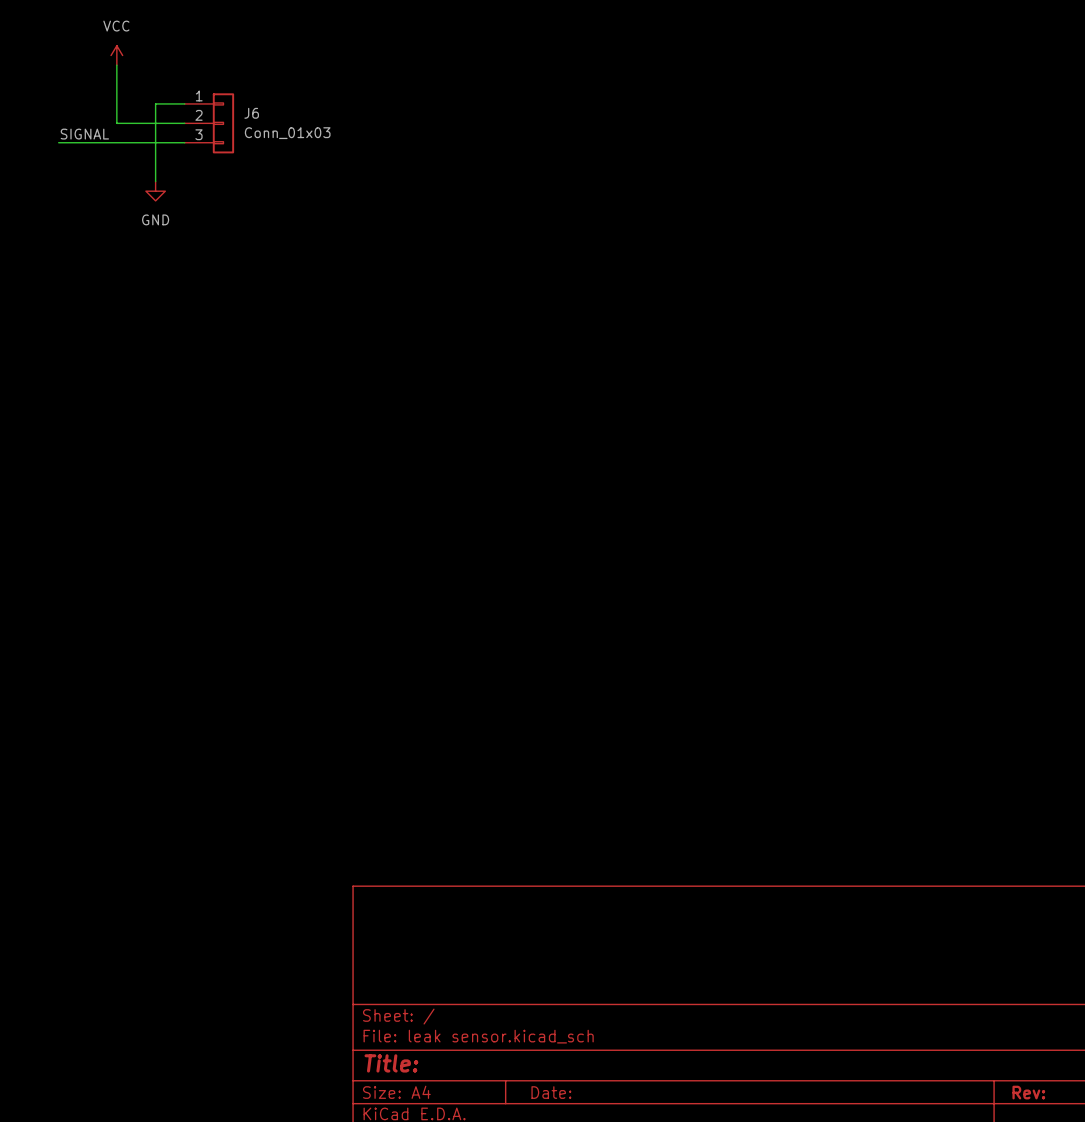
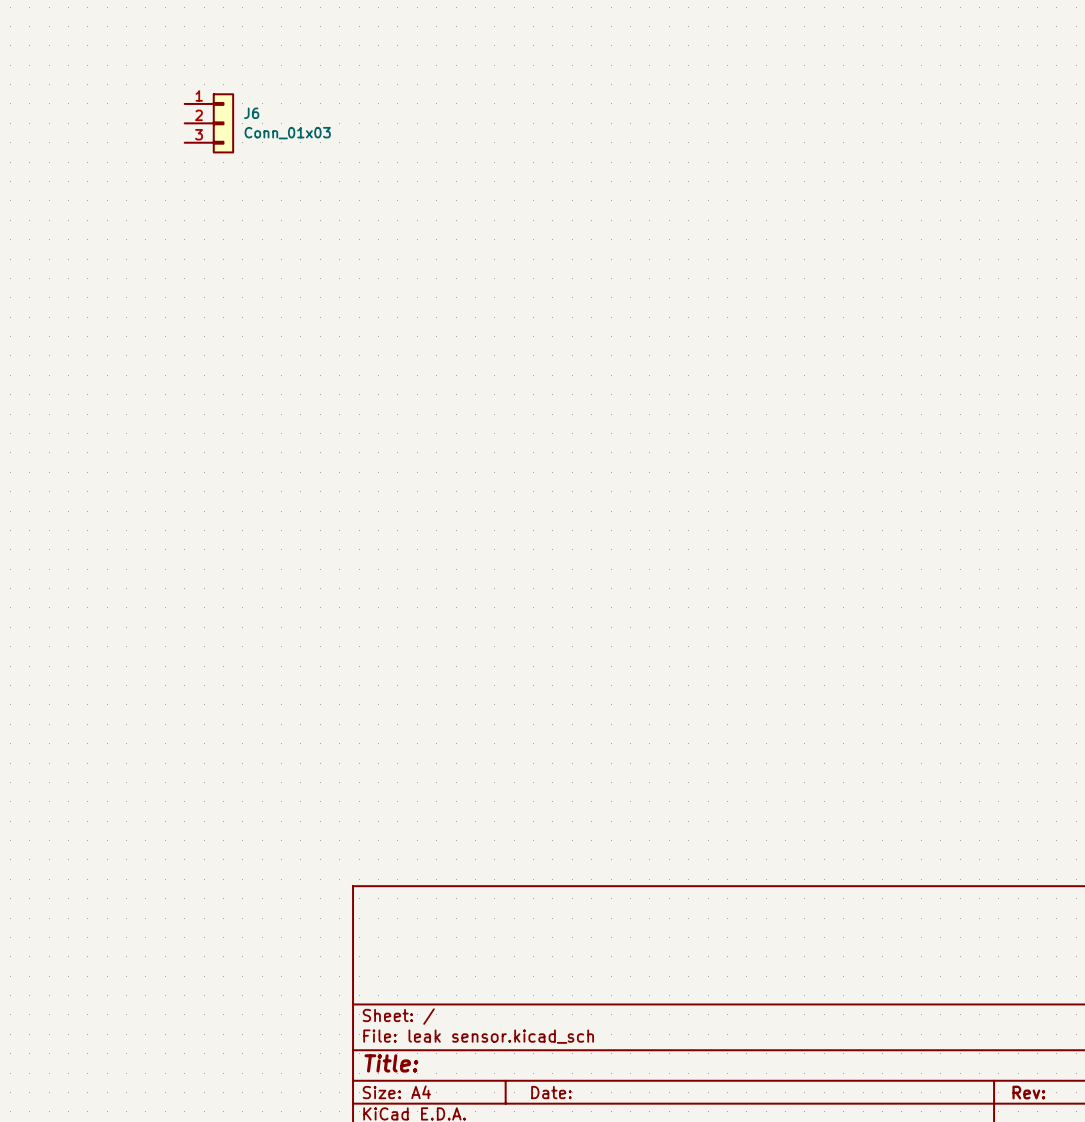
power symbol: VCC (116, 55) -> none
wire: (116, 65) (116, 123) (184, 123) -> none
wire: (184, 103) (155, 103) (155, 181) -> none
label: SIGNAL (84, 134) -> none
wire: (58, 142) (184, 142) -> none
power symbol: GND (155, 191) -> none

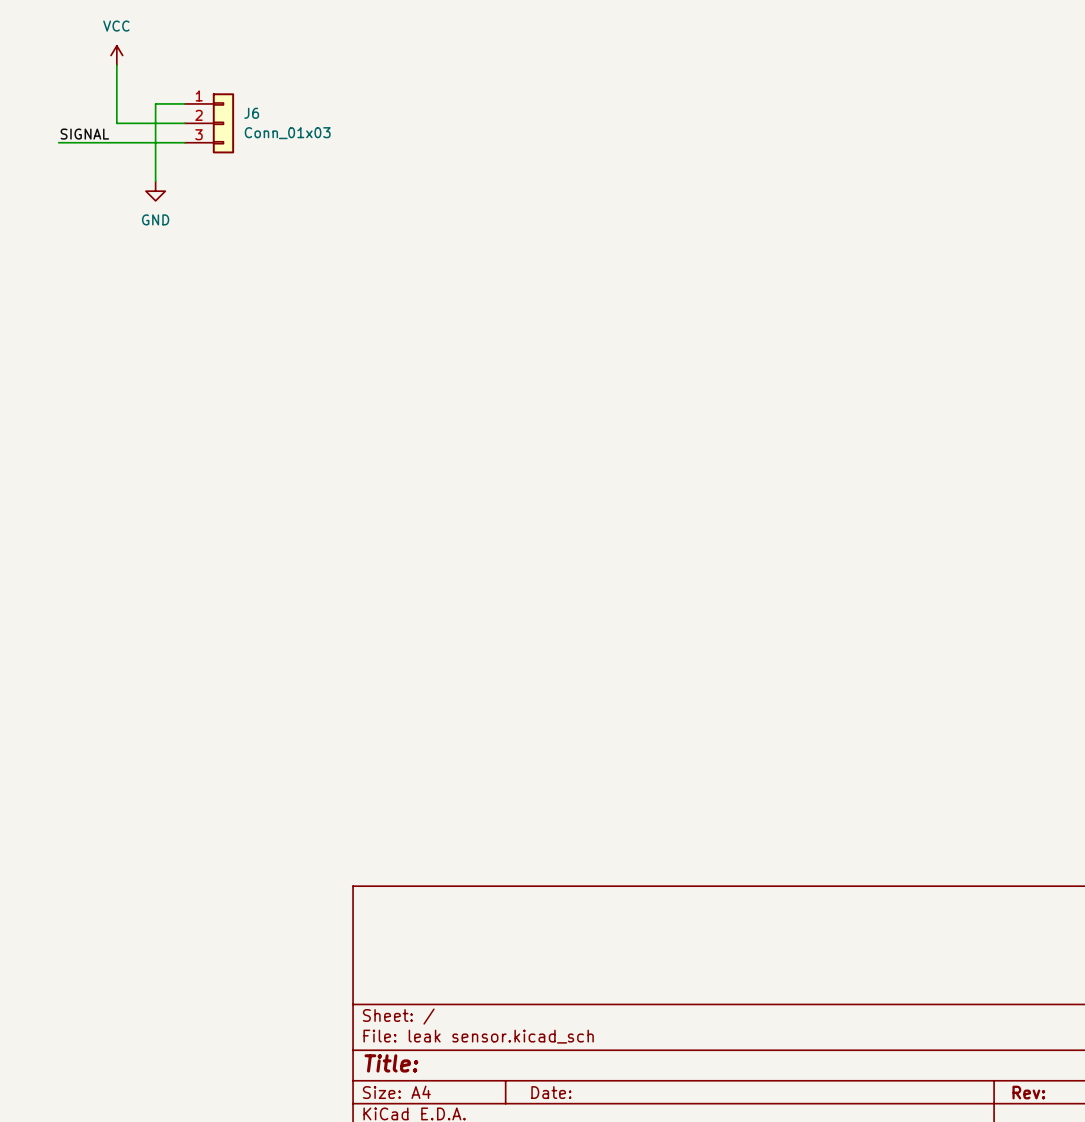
power symbol: none -> VCC (116, 55)
wire: none -> (116, 65) (116, 123) (184, 123)
wire: none -> (184, 103) (155, 103) (155, 181)
label: none -> SIGNAL (84, 134)
wire: none -> (58, 142) (184, 142)
power symbol: none -> GND (155, 191)

